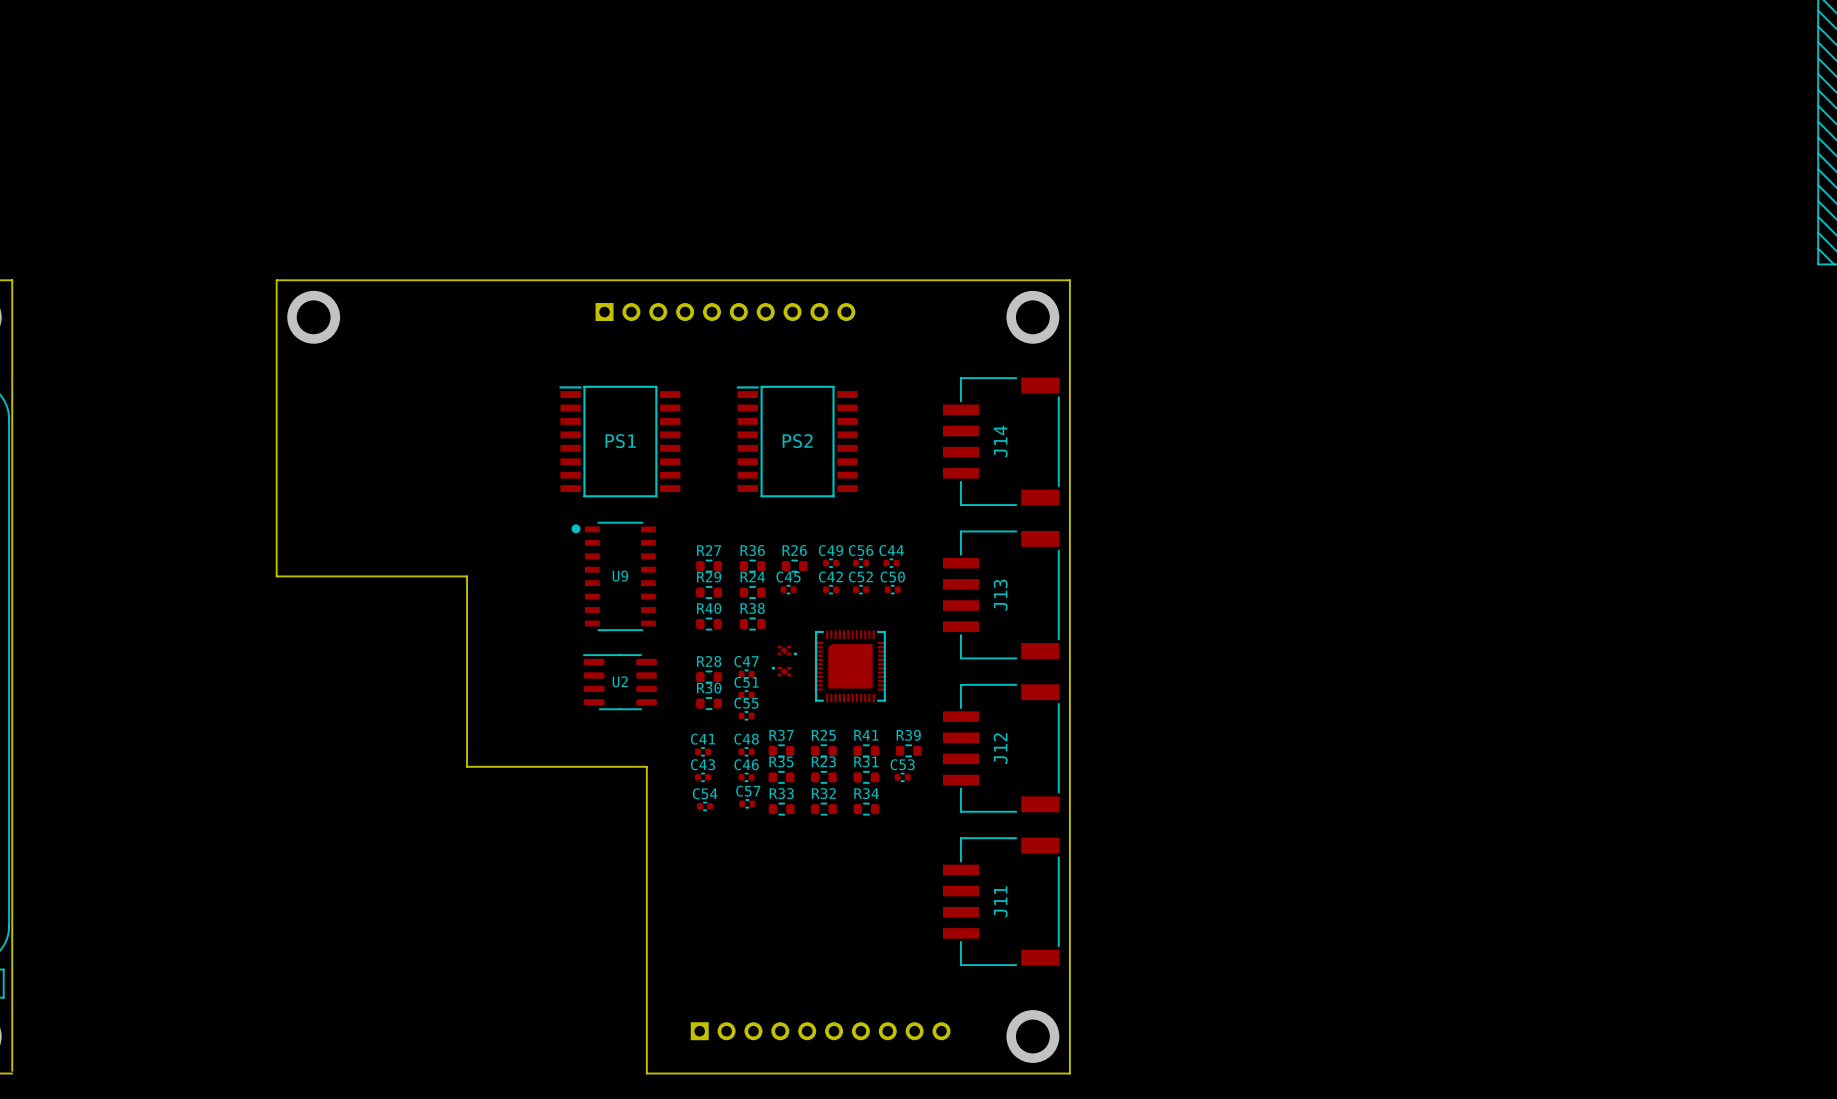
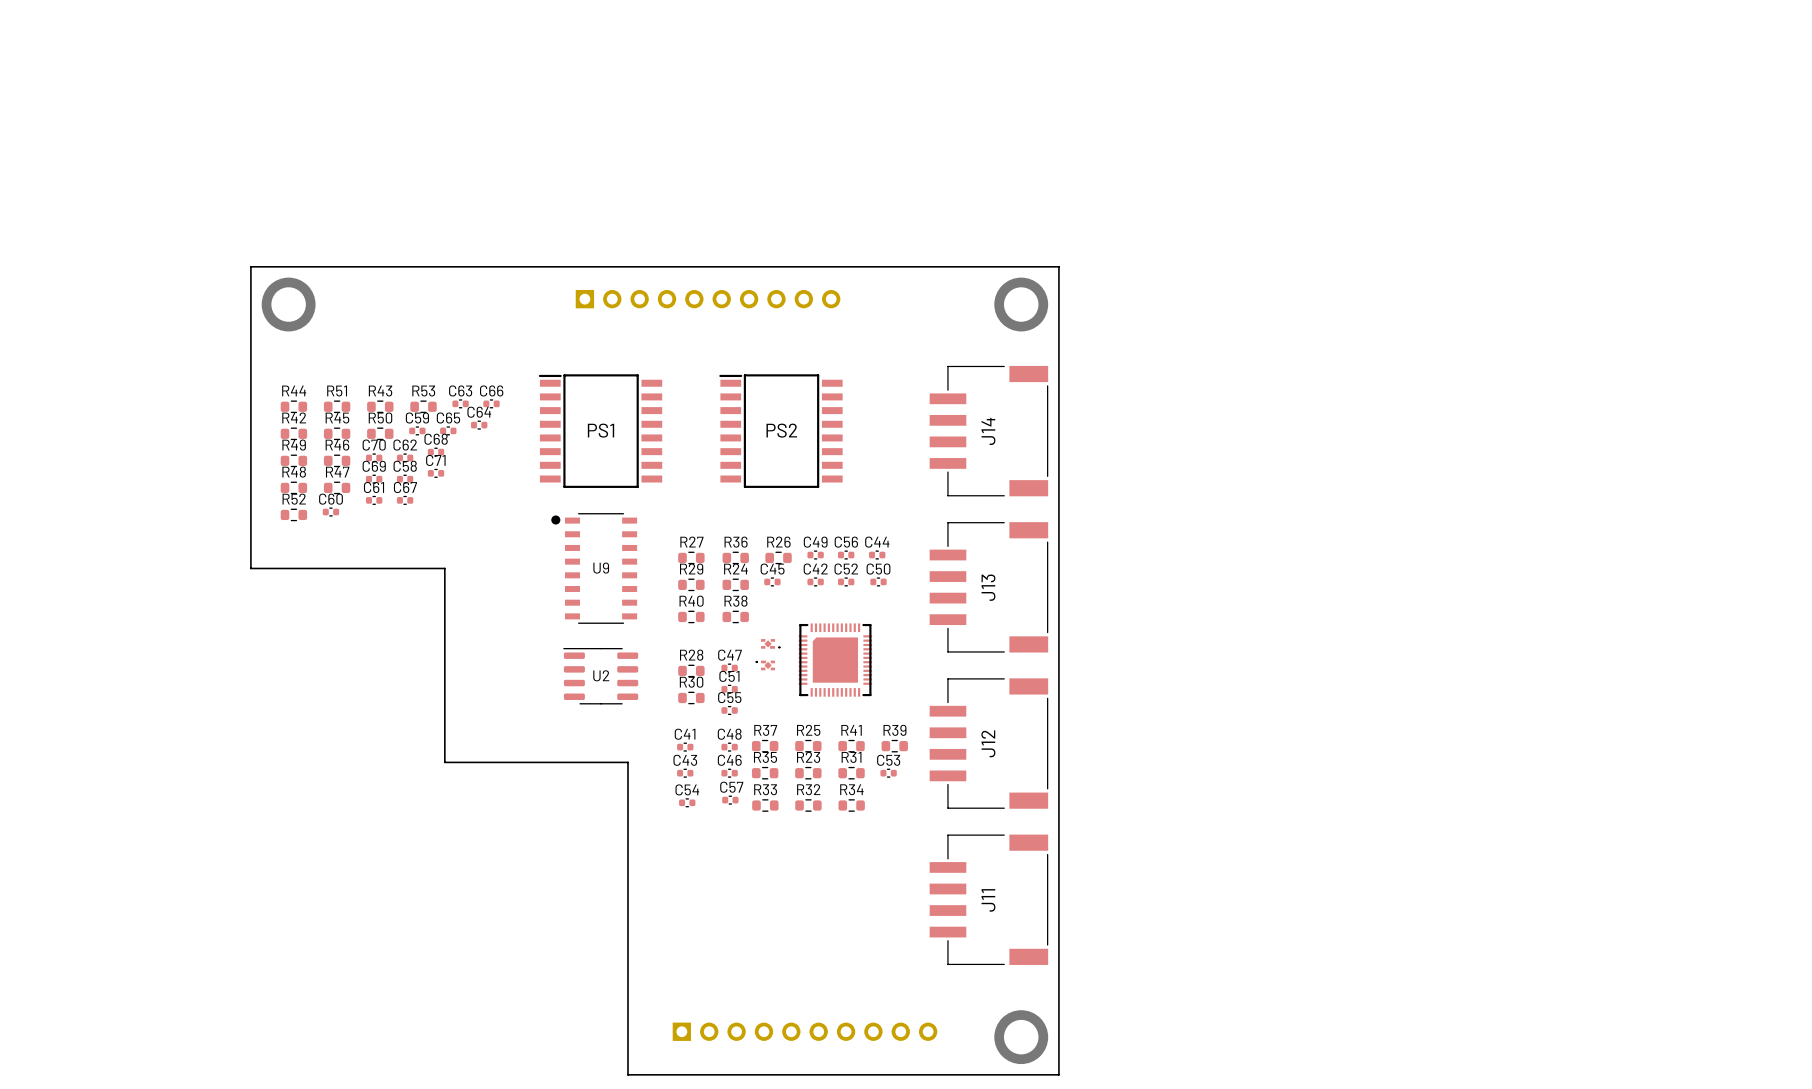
C63: none -> (460, 403)
C66: none -> (491, 403)
R44: none -> (293, 406)
R51: none -> (337, 406)
R43: none -> (380, 406)
R53: none -> (423, 406)
C64: none -> (479, 425)
C59: none -> (417, 430)
C65: none -> (448, 430)
R42: none -> (293, 433)
R45: none -> (337, 433)
R50: none -> (380, 433)
C68: none -> (436, 452)
C70: none -> (374, 457)
C62: none -> (405, 457)
R49: none -> (293, 460)
R46: none -> (337, 460)
C71: none -> (436, 473)
C69: none -> (374, 479)
C58: none -> (405, 479)
R48: none -> (293, 487)
R47: none -> (337, 487)
C61: none -> (374, 500)
C67: none -> (405, 500)
C60: none -> (330, 512)
R52: none -> (293, 514)

